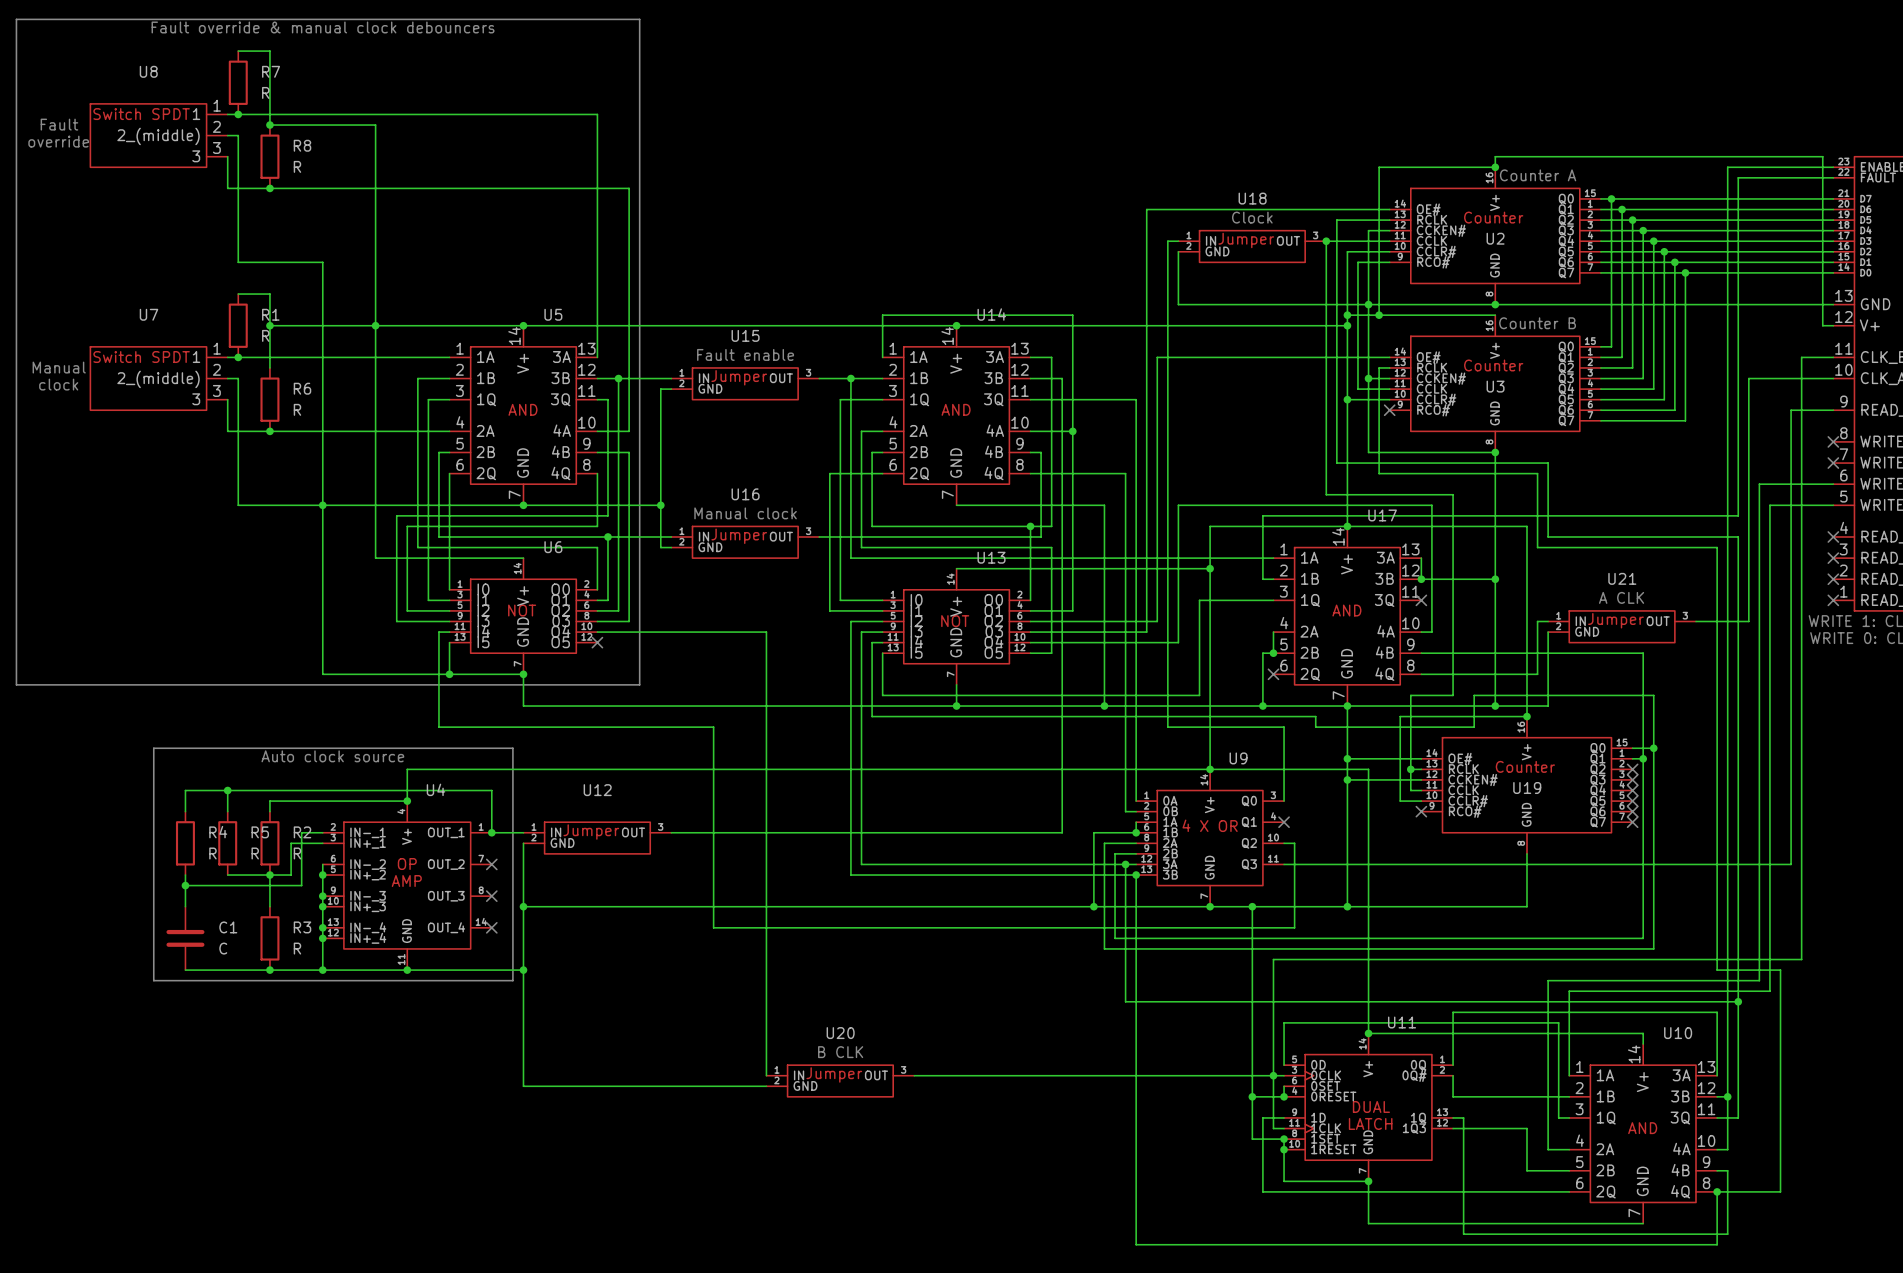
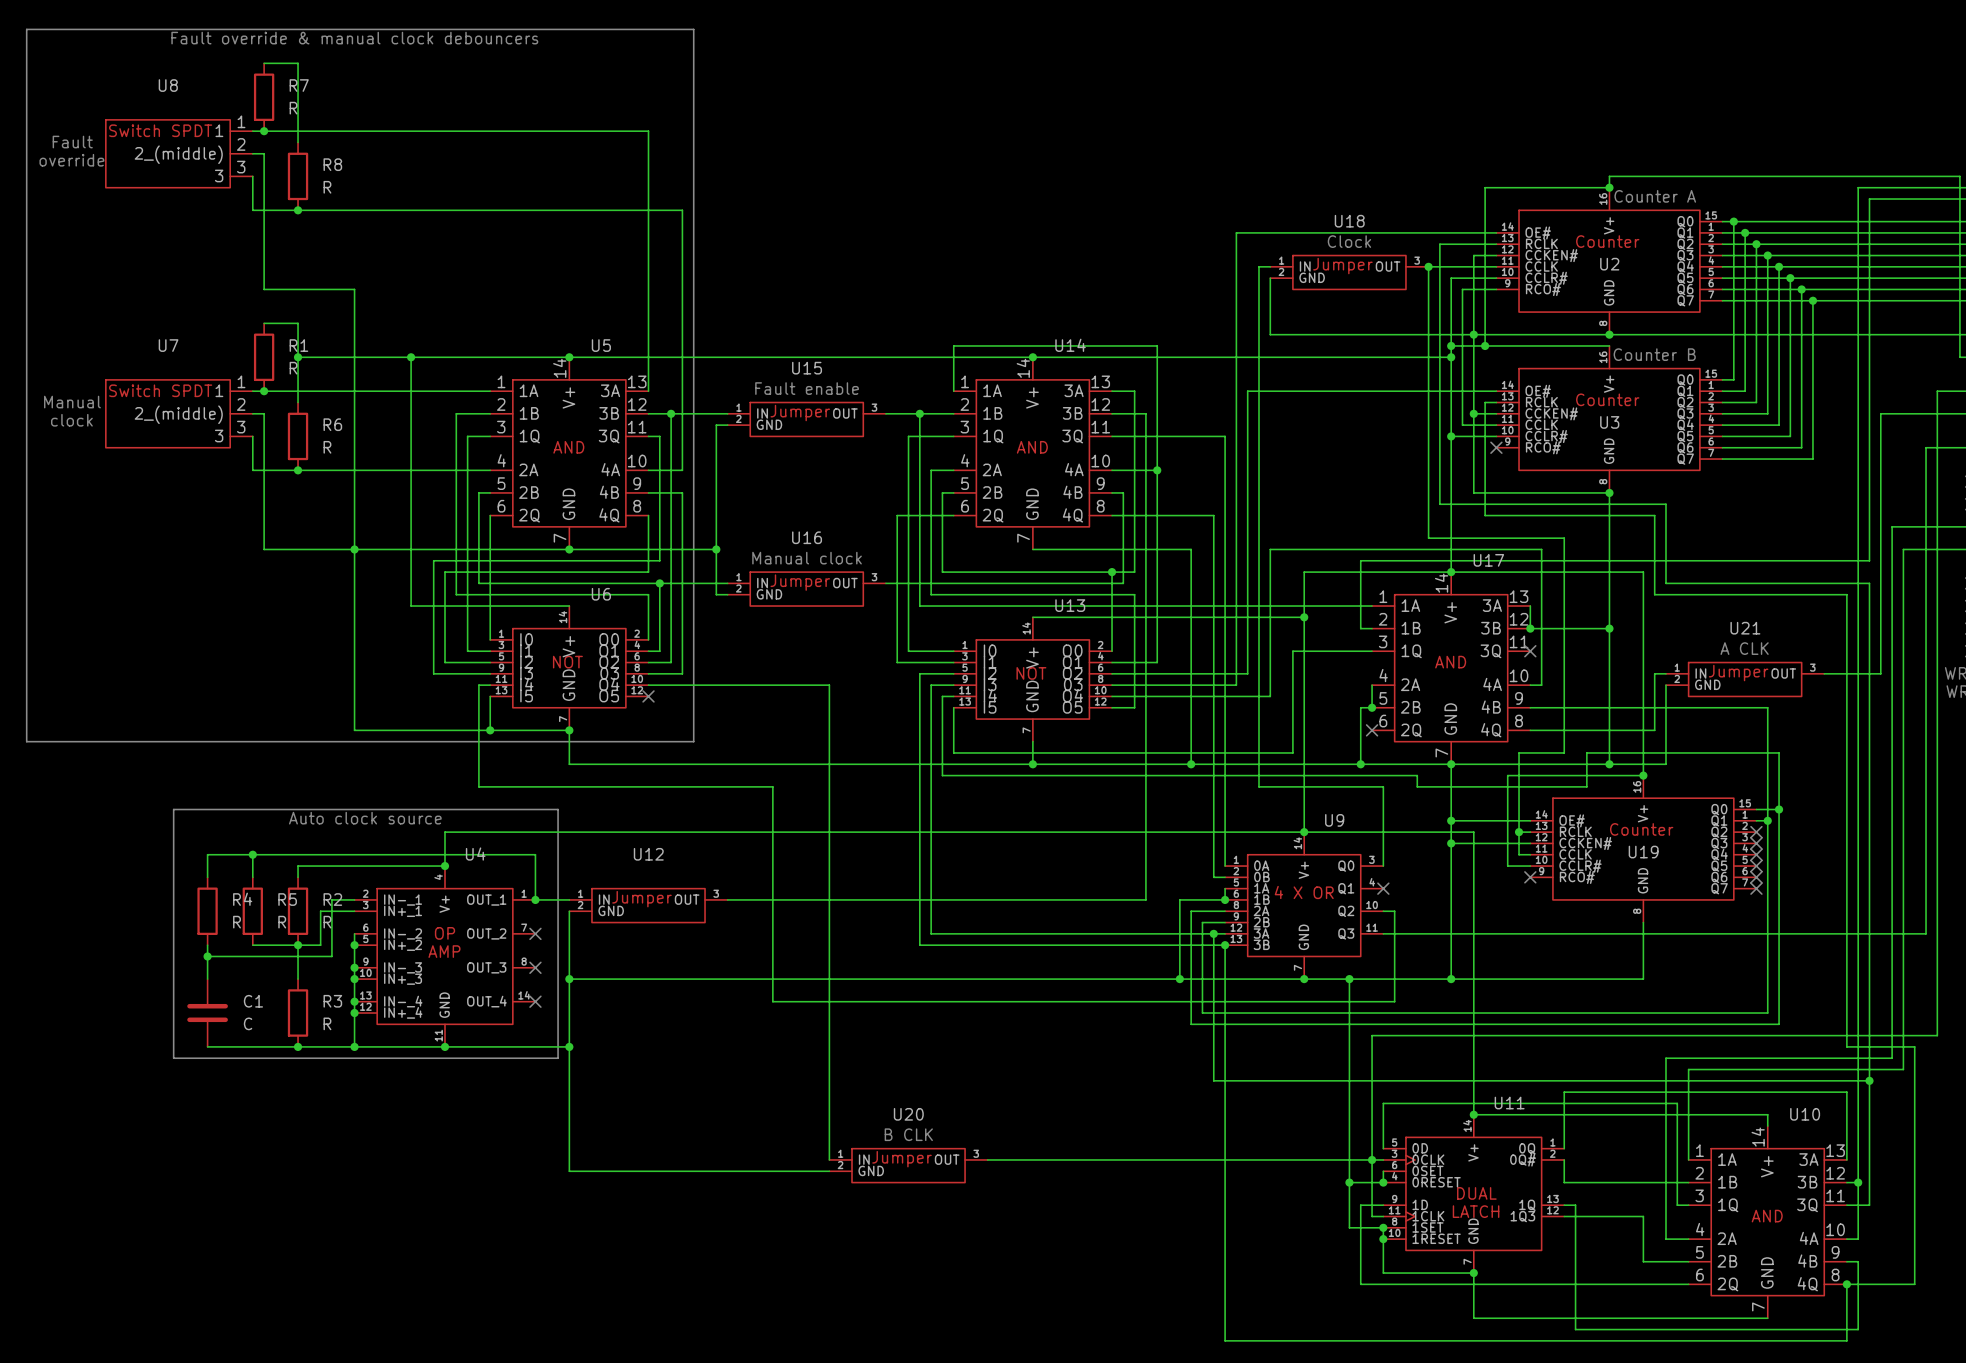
wire: (269, 125) (375, 125) (375, 325) -> none
junction: (269, 125) -> none

